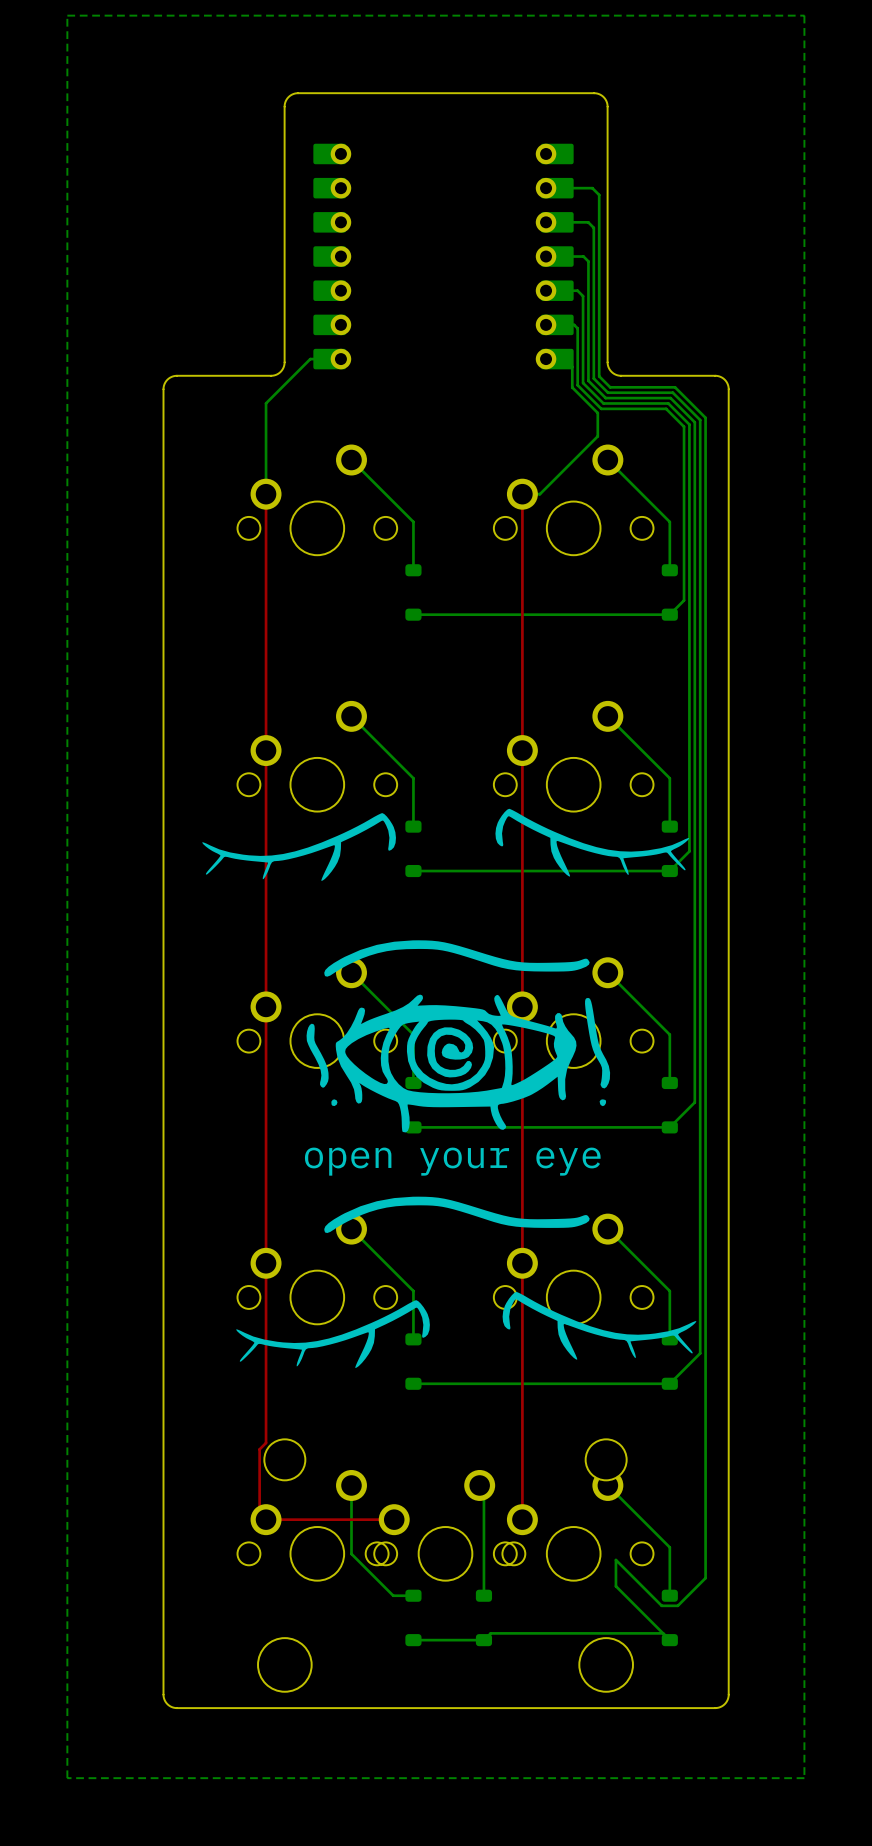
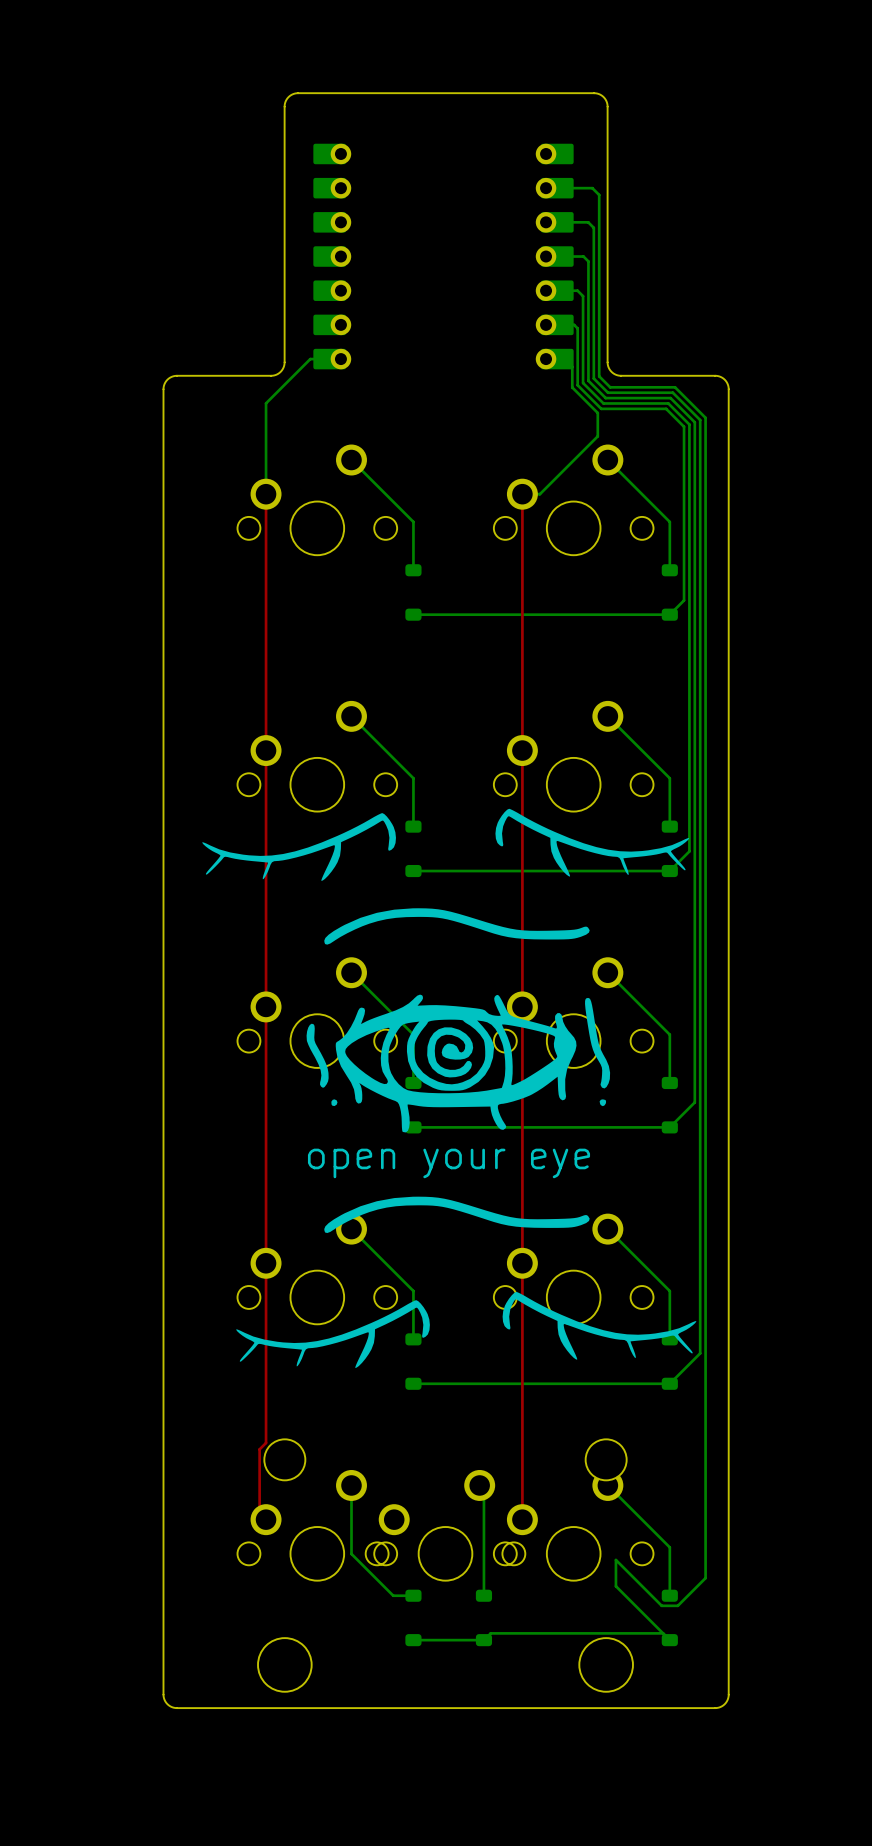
bottom zone outline: (67, 15) (804, 15) (804, 1778) (67, 1778) (67, 15) -> none
drawing position: (456, 958) -> (456, 926)
top track: (266, 1519) (394, 1519) -> none

